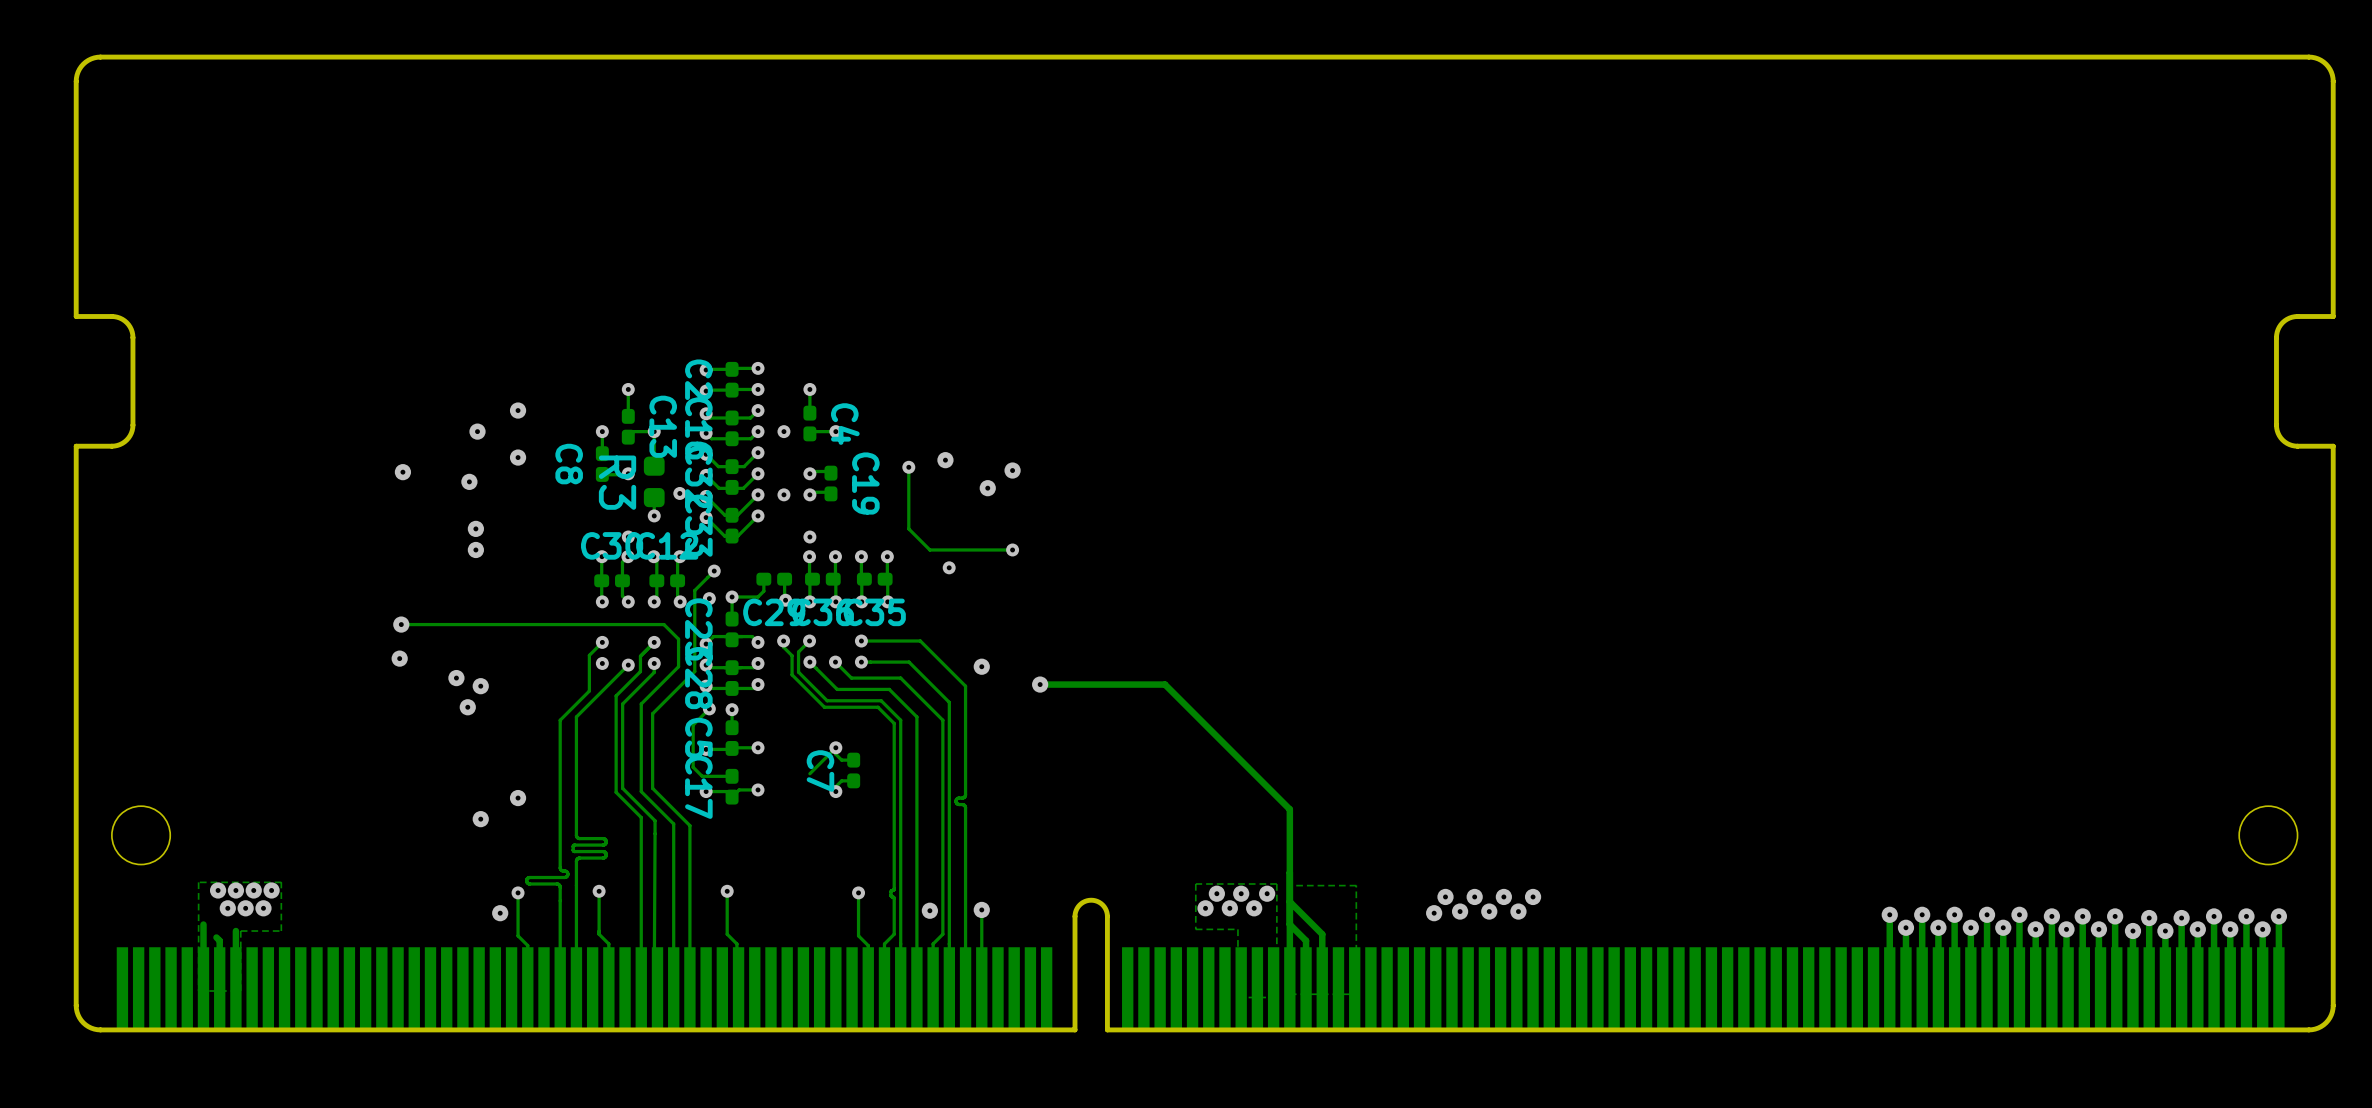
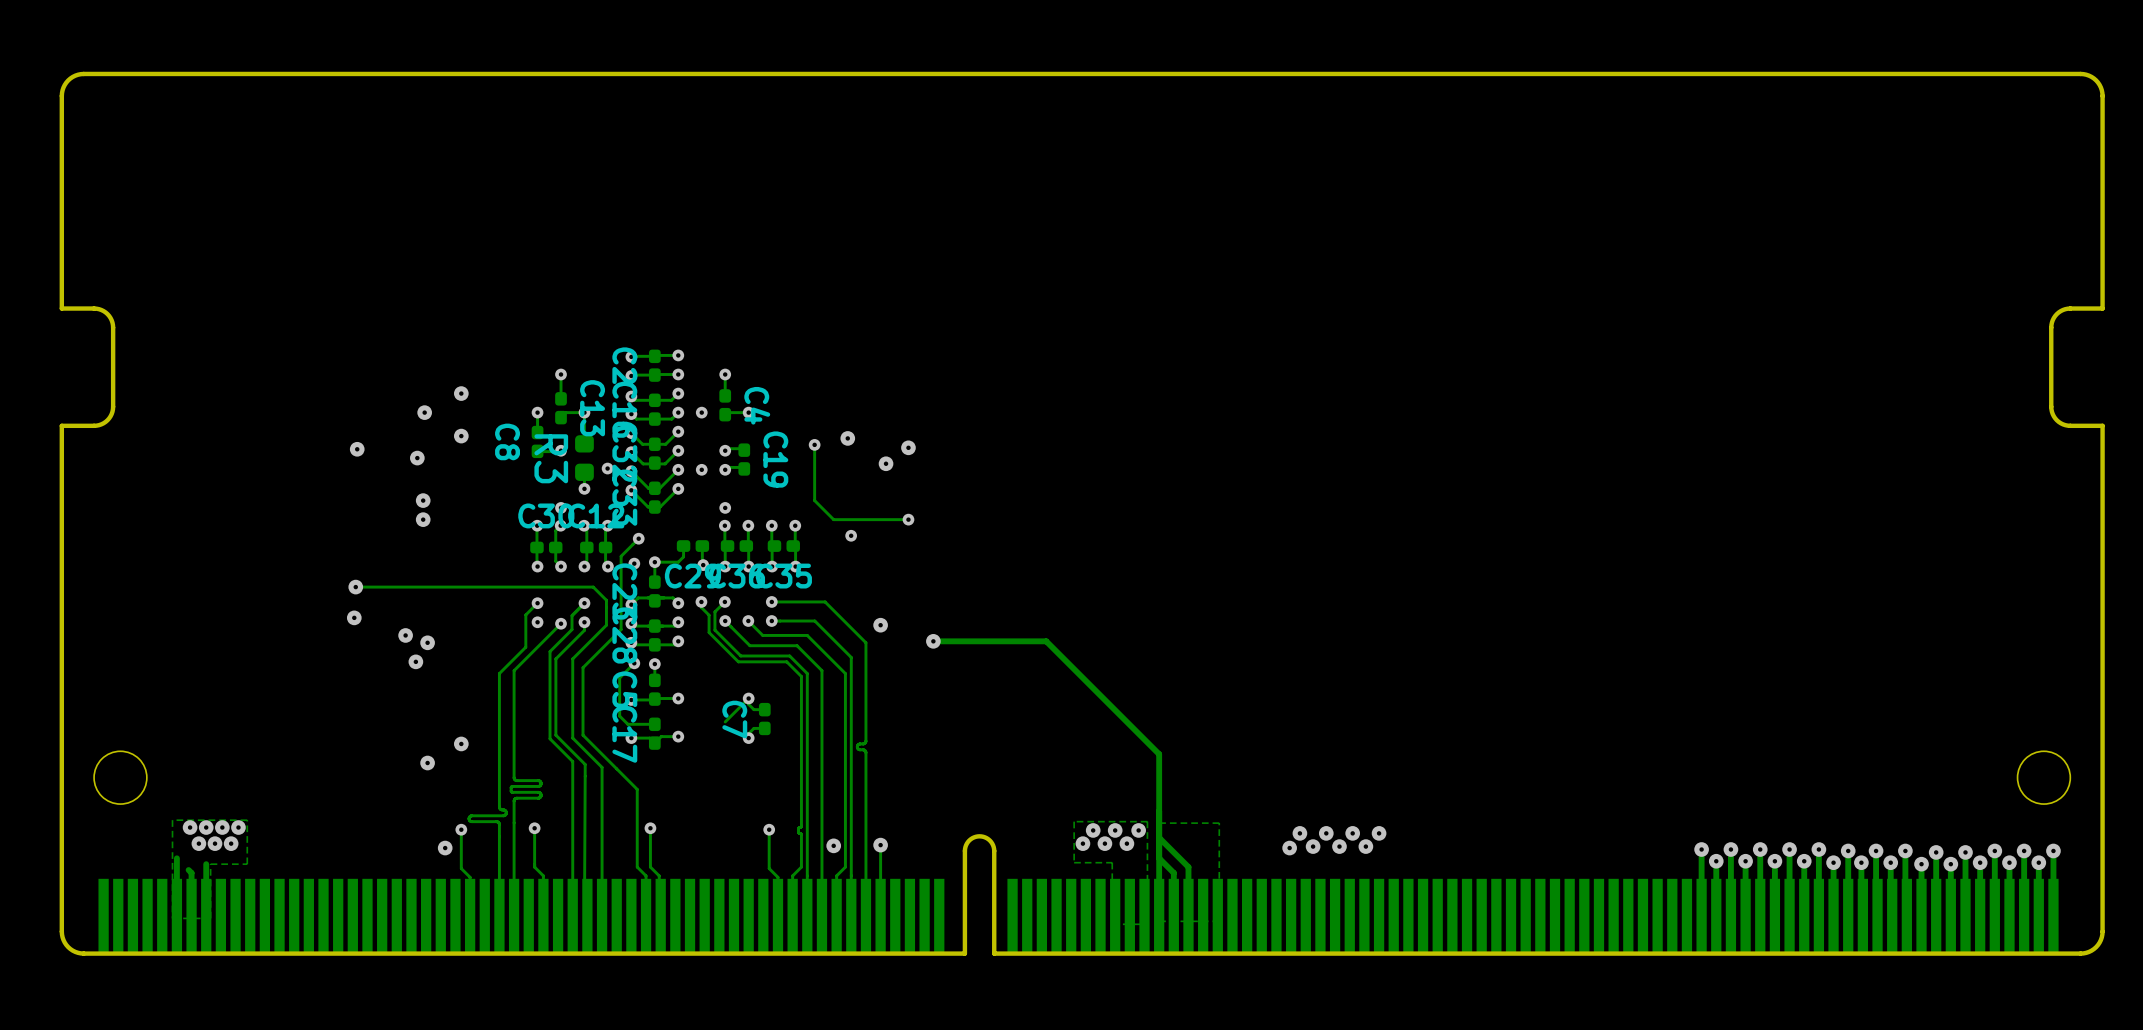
track: (689, 825) (689, 987) -> (616, 768) (637, 789) (637, 867) (646, 875) (646, 915)

